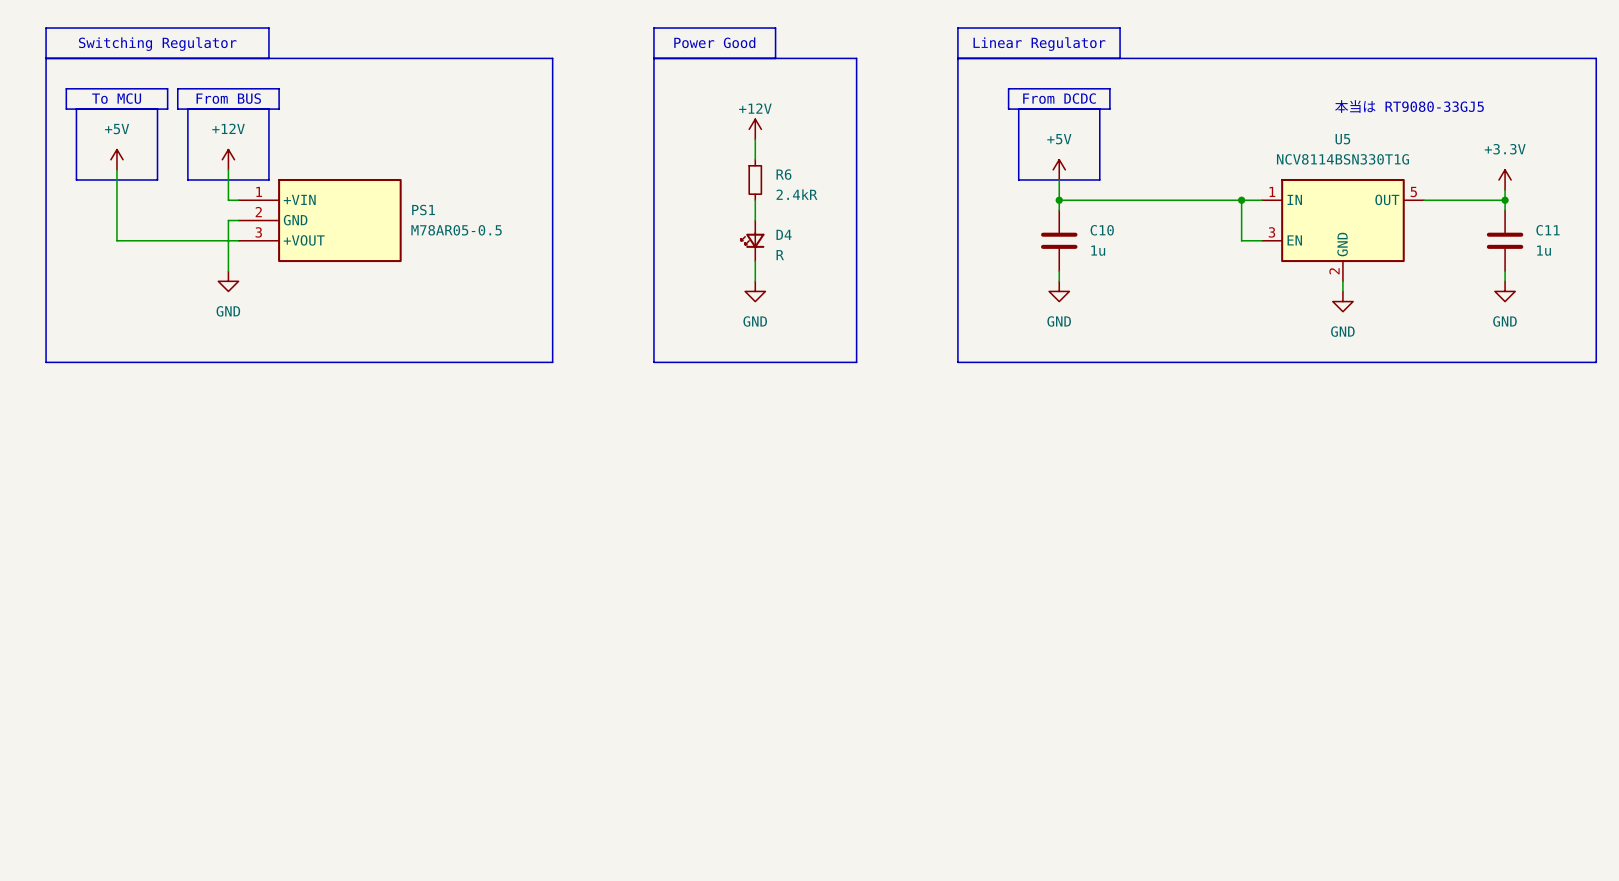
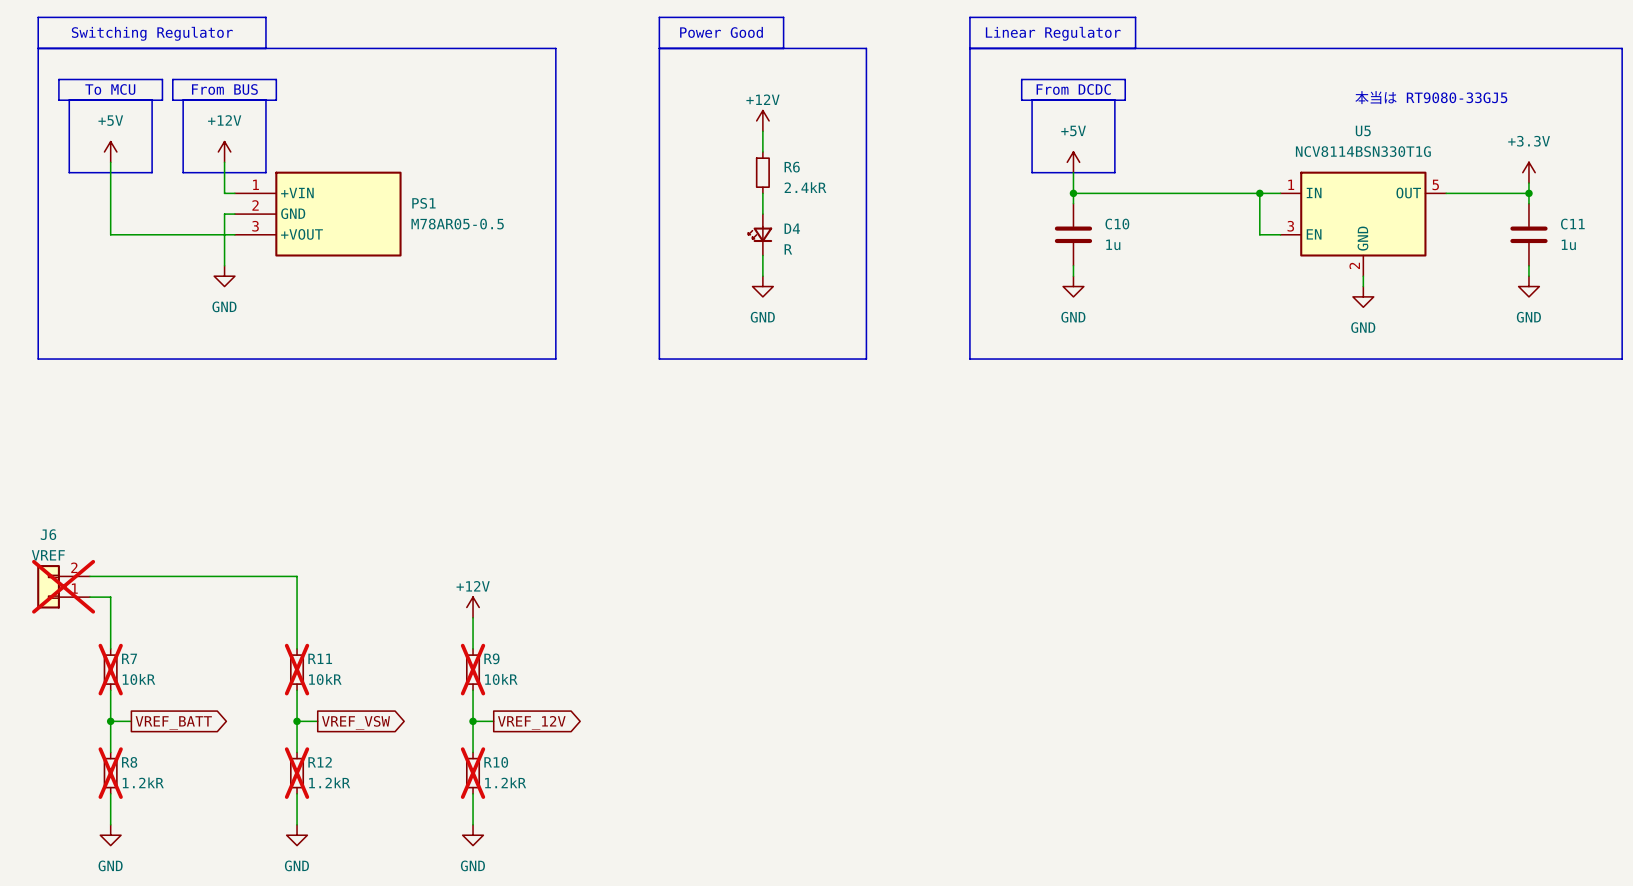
wire: none -> (89, 576) (297, 576) (297, 648)
J6: none -> VREF (63, 586)
wire: none -> (89, 597) (110, 597) (110, 648)
power symbol: none -> +12V (473, 607)
wire: none -> (473, 617) (473, 648)
R7: none -> 10kR (110, 669)
R11: none -> 10kR (297, 669)
R9: none -> 10kR (473, 669)
wire: none -> (110, 690) (110, 752)
wire: none -> (297, 690) (297, 752)
wire: none -> (473, 690) (473, 752)
wire: none -> (110, 721) (131, 721)
junction: none -> (110, 721)
wire: none -> (297, 721) (317, 721)
junction: none -> (297, 721)
wire: none -> (473, 721) (493, 721)
junction: none -> (473, 721)
global label: none -> VREF_BATT (173, 723)
global label: none -> VREF_VSW (356, 722)
global label: none -> VREF_12V (531, 722)
R8: none -> 1.2kR (110, 773)
R12: none -> 1.2kR (297, 773)
R10: none -> 1.2kR (473, 773)
wire: none -> (110, 793) (110, 824)
wire: none -> (297, 793) (297, 824)
wire: none -> (473, 793) (473, 824)
power symbol: none -> GND (110, 835)
power symbol: none -> GND (297, 835)
power symbol: none -> GND (473, 835)

